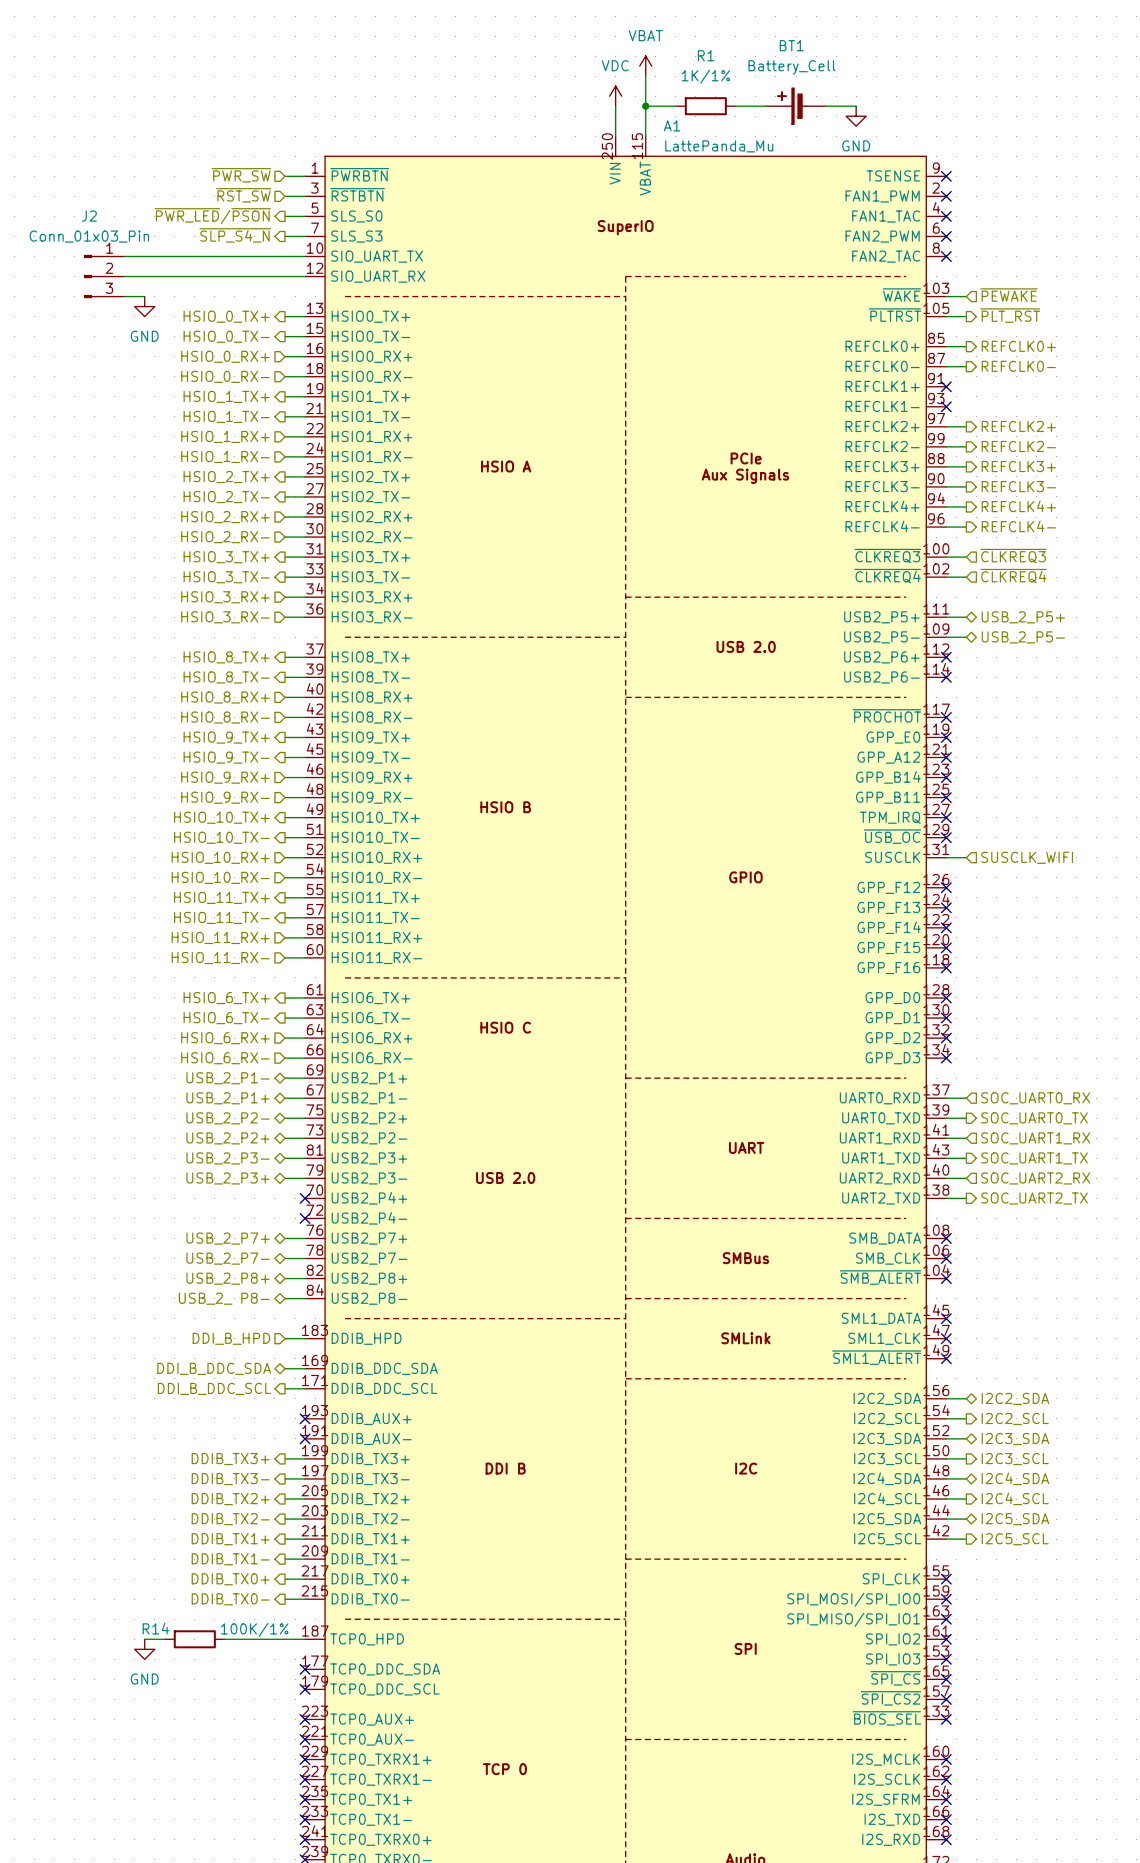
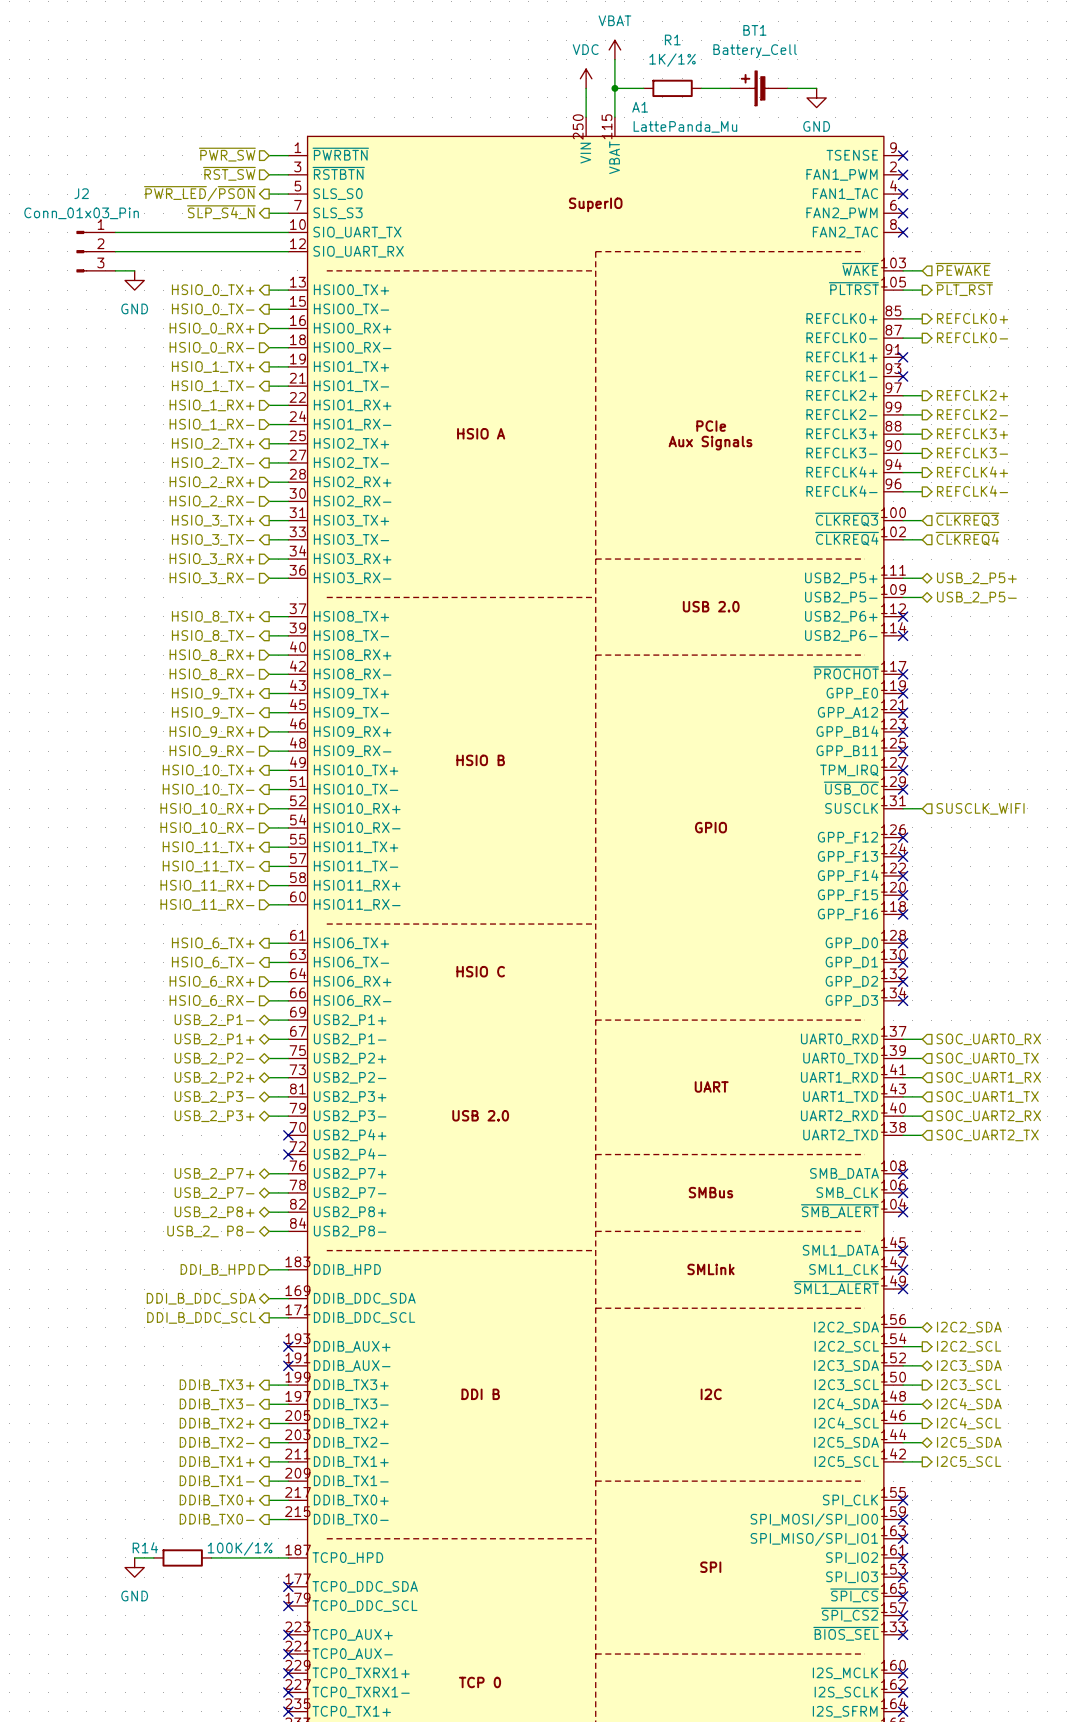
hierarchical label shape: output (1034, 1118) -> input (987, 1058)
hierarchical label shape: output (1034, 1158) -> input (987, 1097)
hierarchical label shape: output (1034, 1198) -> input (987, 1135)

